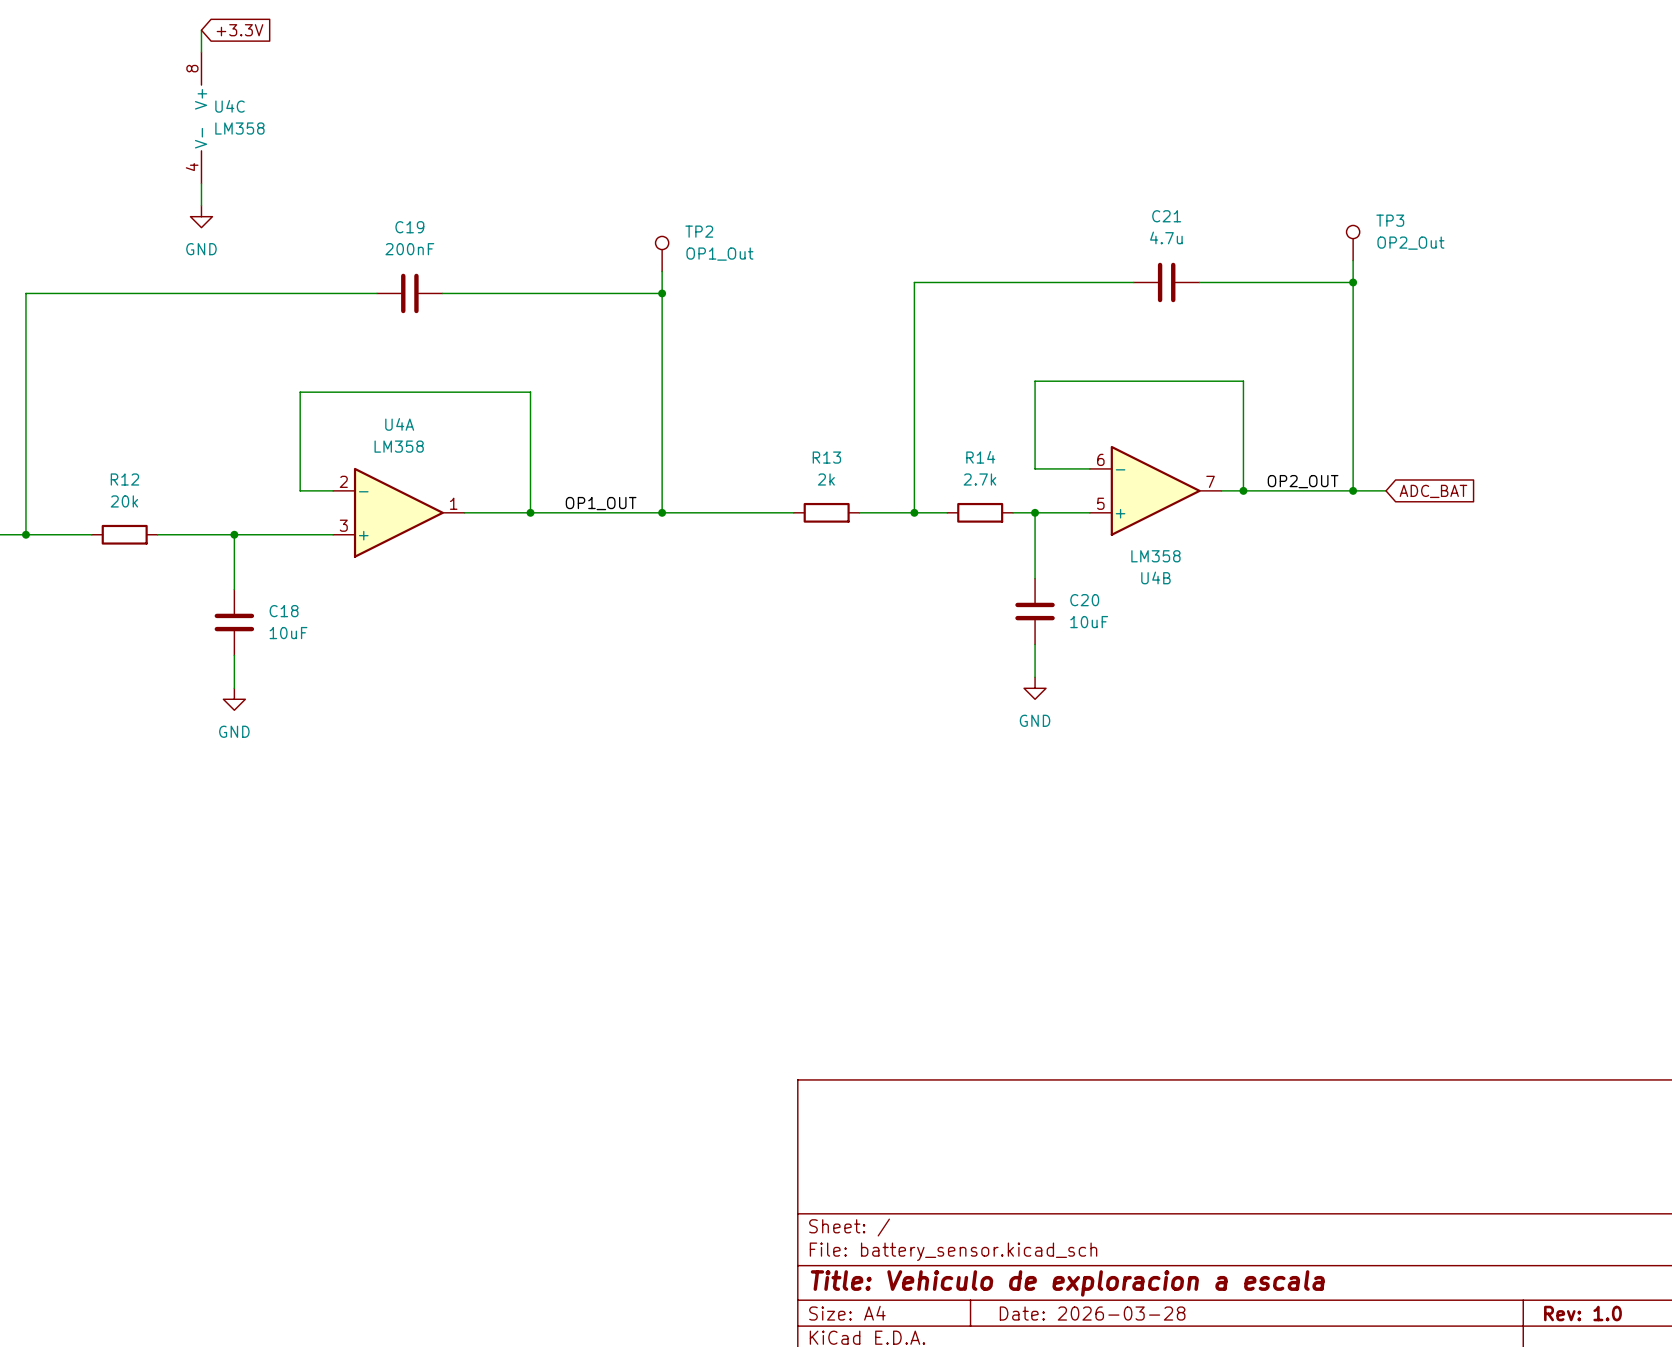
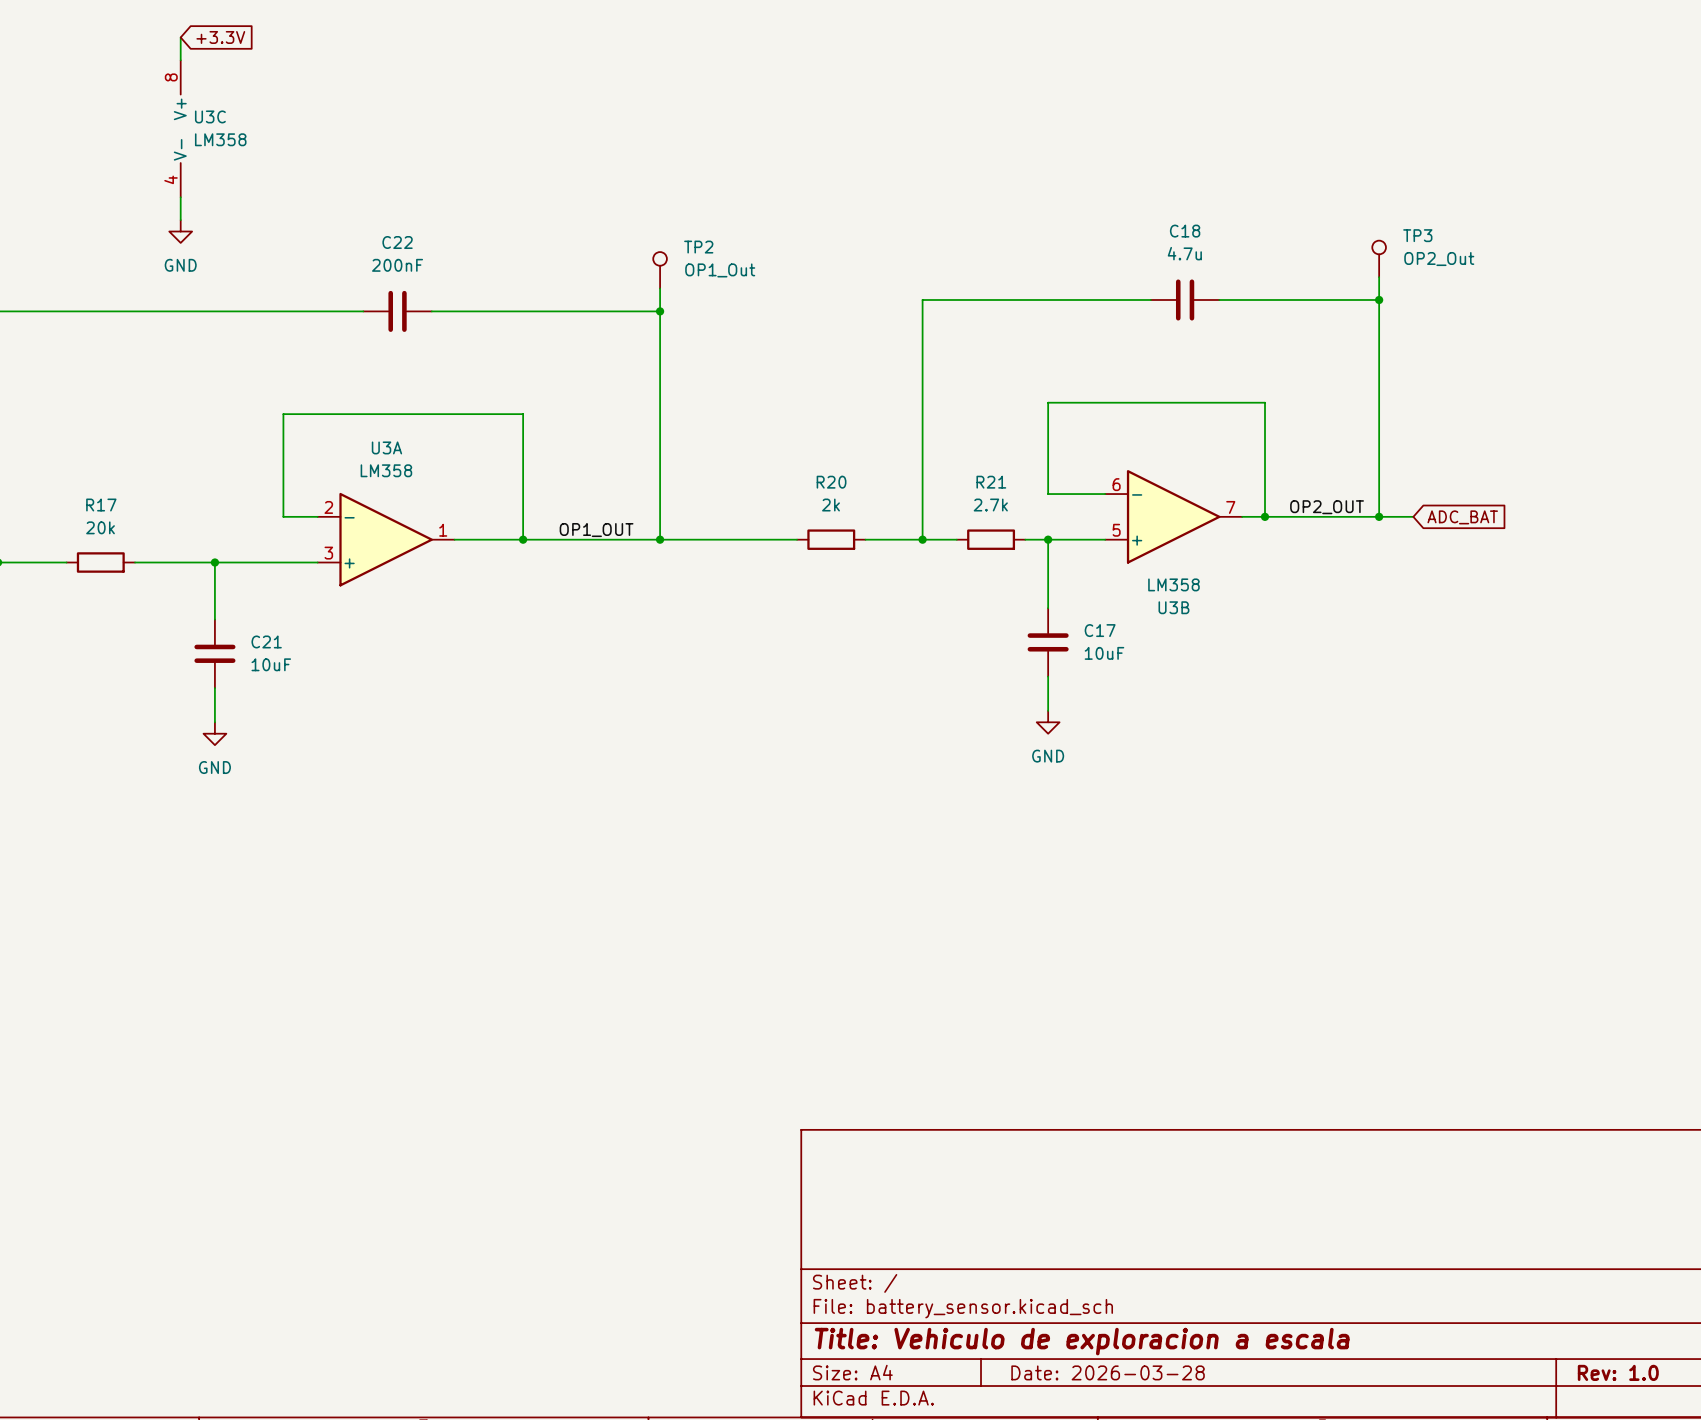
U4C name: U4C (230, 106) -> U3C (210, 116)
C21 name: C21 (1166, 216) -> C18 (1185, 231)
C19 name: C19 (409, 227) -> C22 (397, 242)
U4A name: U4A (399, 424) -> U3A (386, 447)
R13 name: R13 (826, 457) -> R20 (831, 482)
R14 name: R14 (980, 457) -> R21 (991, 482)
R12 name: R12 (124, 479) -> R17 (101, 505)
U4B name: U4B (1155, 577) -> U3B (1173, 607)
C20 name: C20 (1084, 600) -> C17 (1100, 630)
C18 name: C18 (284, 611) -> C21 (266, 641)

